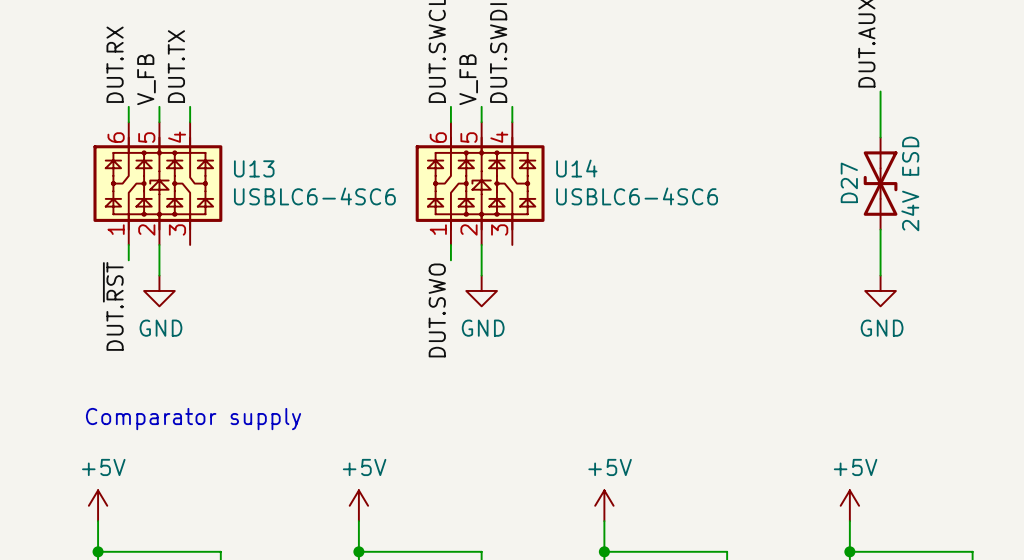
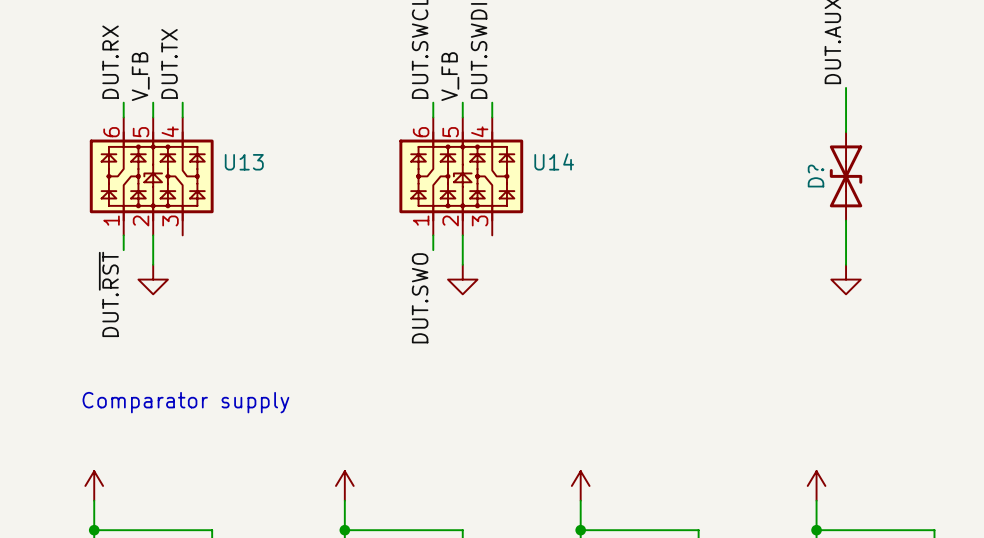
D27 name: D27 (849, 182) -> D? (816, 176)
D27 value: 24V ESD (910, 183) -> none
U13 value: USBLC6-4SC6 (314, 196) -> none
U14 value: USBLC6-4SC6 (637, 196) -> none
power symbol text: GND (160, 328) -> none
power symbol text: GND (483, 328) -> none
power symbol text: GND (882, 328) -> none
power symbol text: +5V (103, 467) -> none
power symbol text: +5V (364, 467) -> none
power symbol text: +5V (610, 467) -> none
power symbol text: +5V (855, 467) -> none

